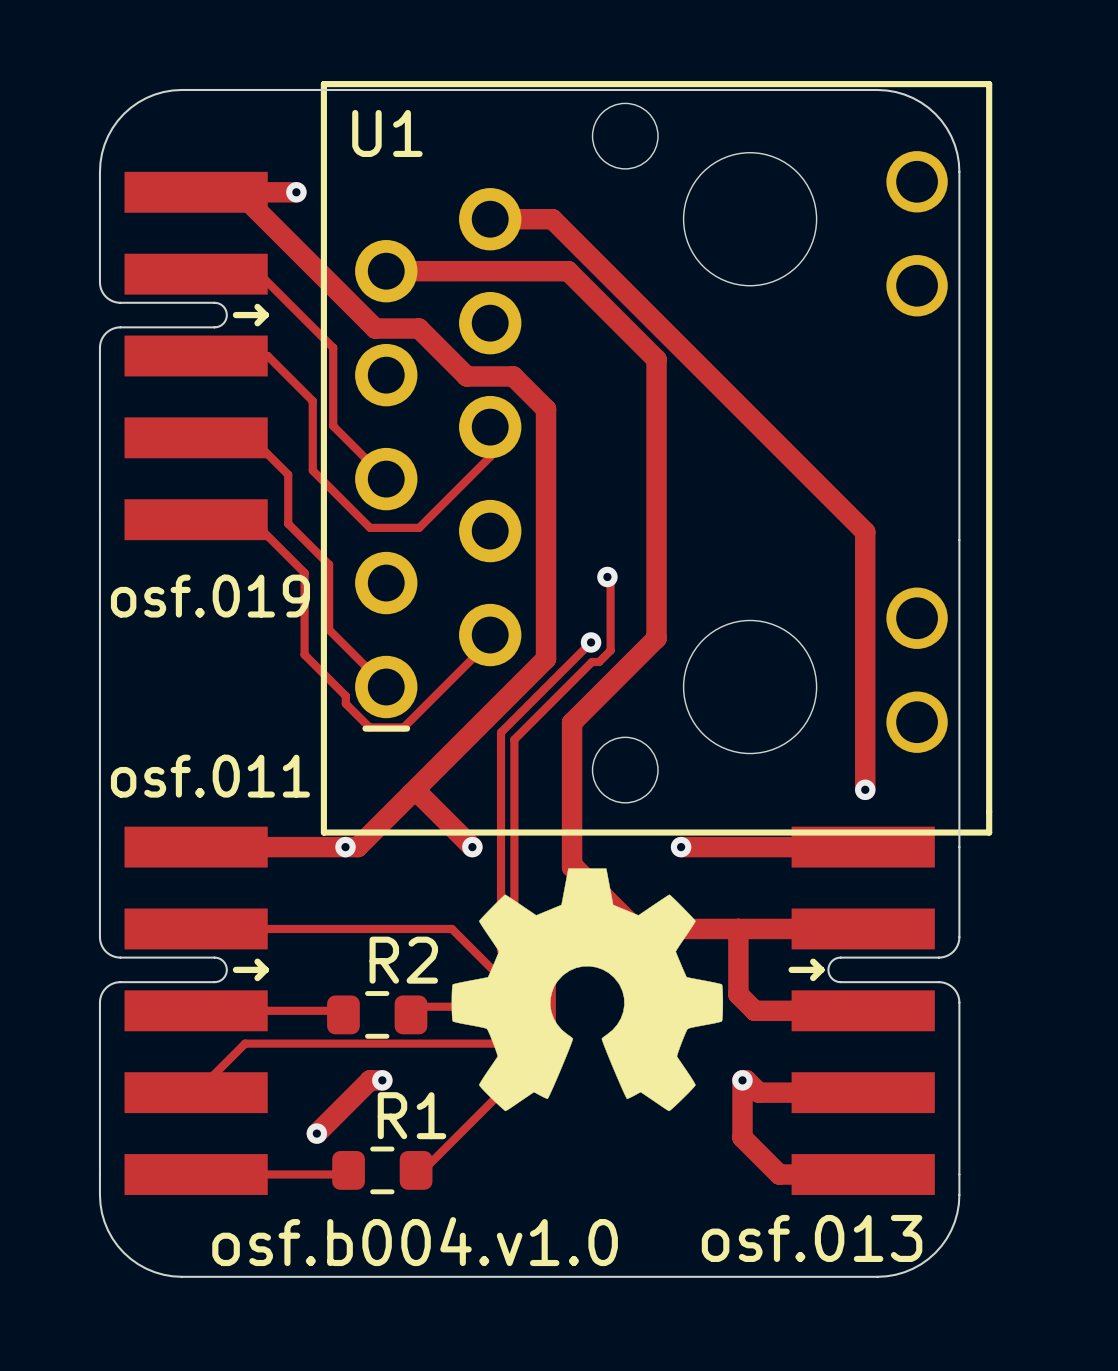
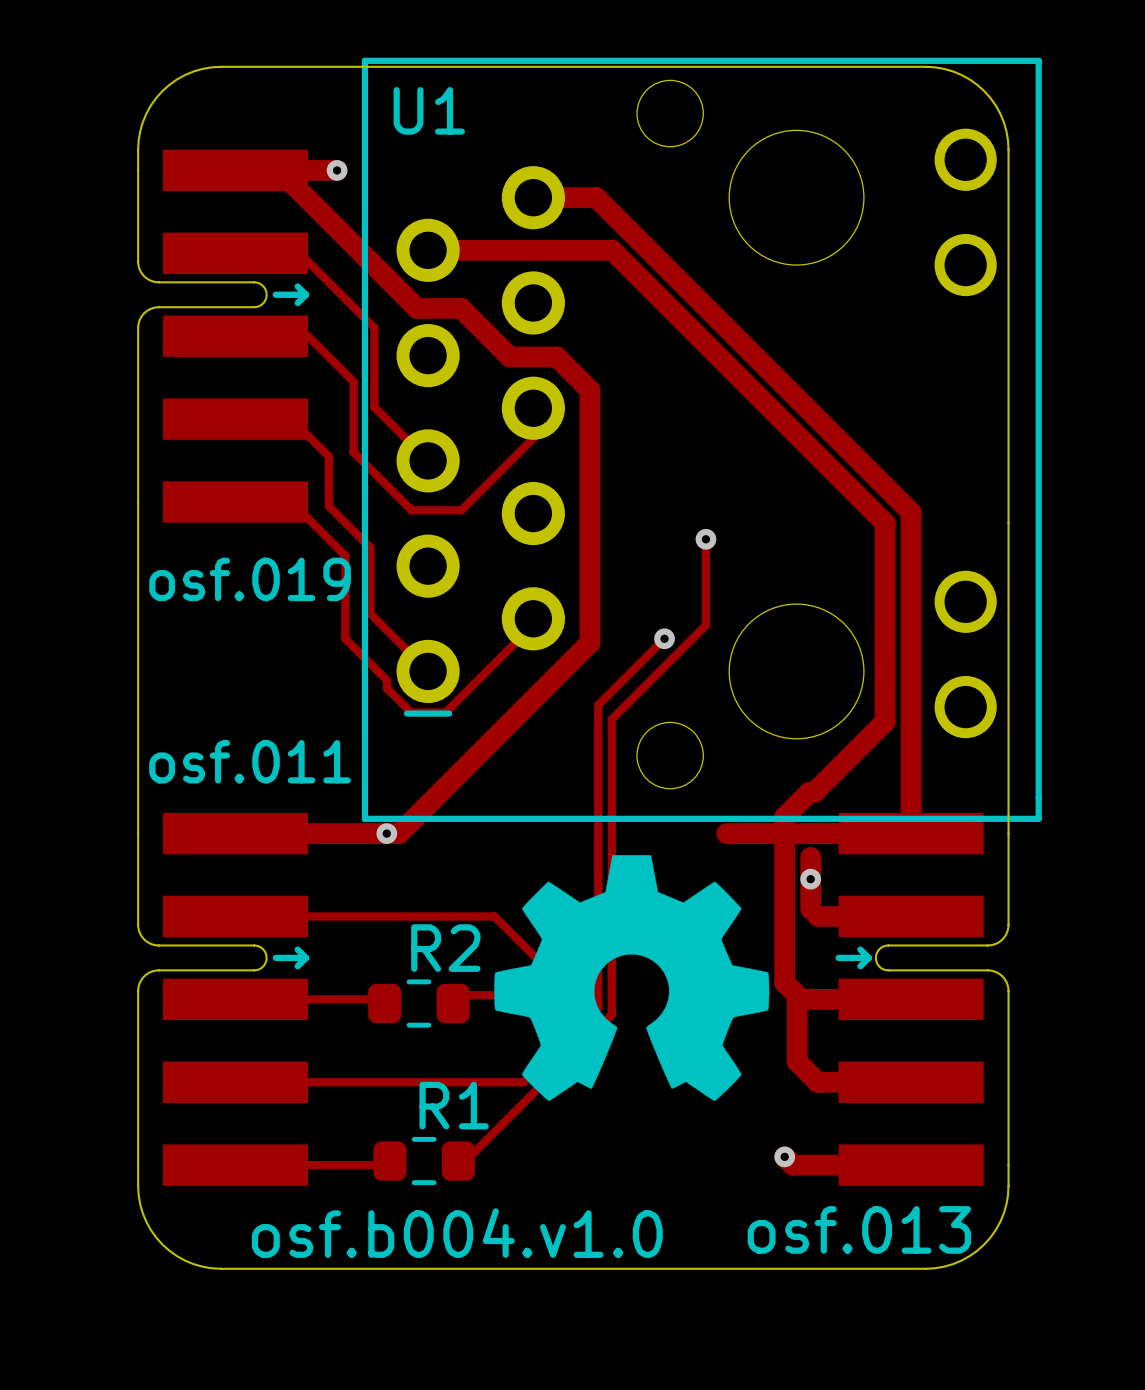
track: (656, 359) (656, 638) (572, 722) (572, 867) (574, 867) (636, 928) (771, 928) -> (701, 339) (885, 523) (885, 721) (814, 792) (809, 792) (784, 817) (784, 916)
track: (863, 529) (865, 531) (865, 789) -> (911, 512) (911, 833)
via: none -> (705, 539)
track: (607, 576) (610, 580) (610, 650) (599, 661) (592, 661) (514, 739) (514, 944) (551, 982) (551, 1041) -> (705, 539) (705, 625) (611, 719) (611, 1014) (595, 1030)
via: (607, 576) -> none
track: (591, 642) (501, 732) (501, 950) (538, 987) (538, 1034) -> (664, 638) (598, 705) (598, 1007) (582, 1023)
via position: (591, 642) -> (664, 638)
via: (865, 789) -> none
track: (410, 793) (419, 793) (472, 847) -> none
via: (472, 847) -> none
via: (681, 847) -> none
track: none -> (810, 857) (810, 909)
via: none -> (810, 879)
track: none -> (801, 999) (797, 1003) (797, 1061) (817, 1082)
track: (529, 1043) (245, 1043) (196, 1092) -> (573, 1032) (523, 1082) (235, 1082)
track: (382, 1080) (370, 1080) (316, 1133) -> none
via: (382, 1080) -> none
via position: (742, 1080) -> (784, 1156)
track: (771, 1092) (758, 1092) (746, 1080) (742, 1080) (742, 1137) (779, 1174) -> (784, 1156) (793, 1165) (826, 1165)
via: (316, 1133) -> none

